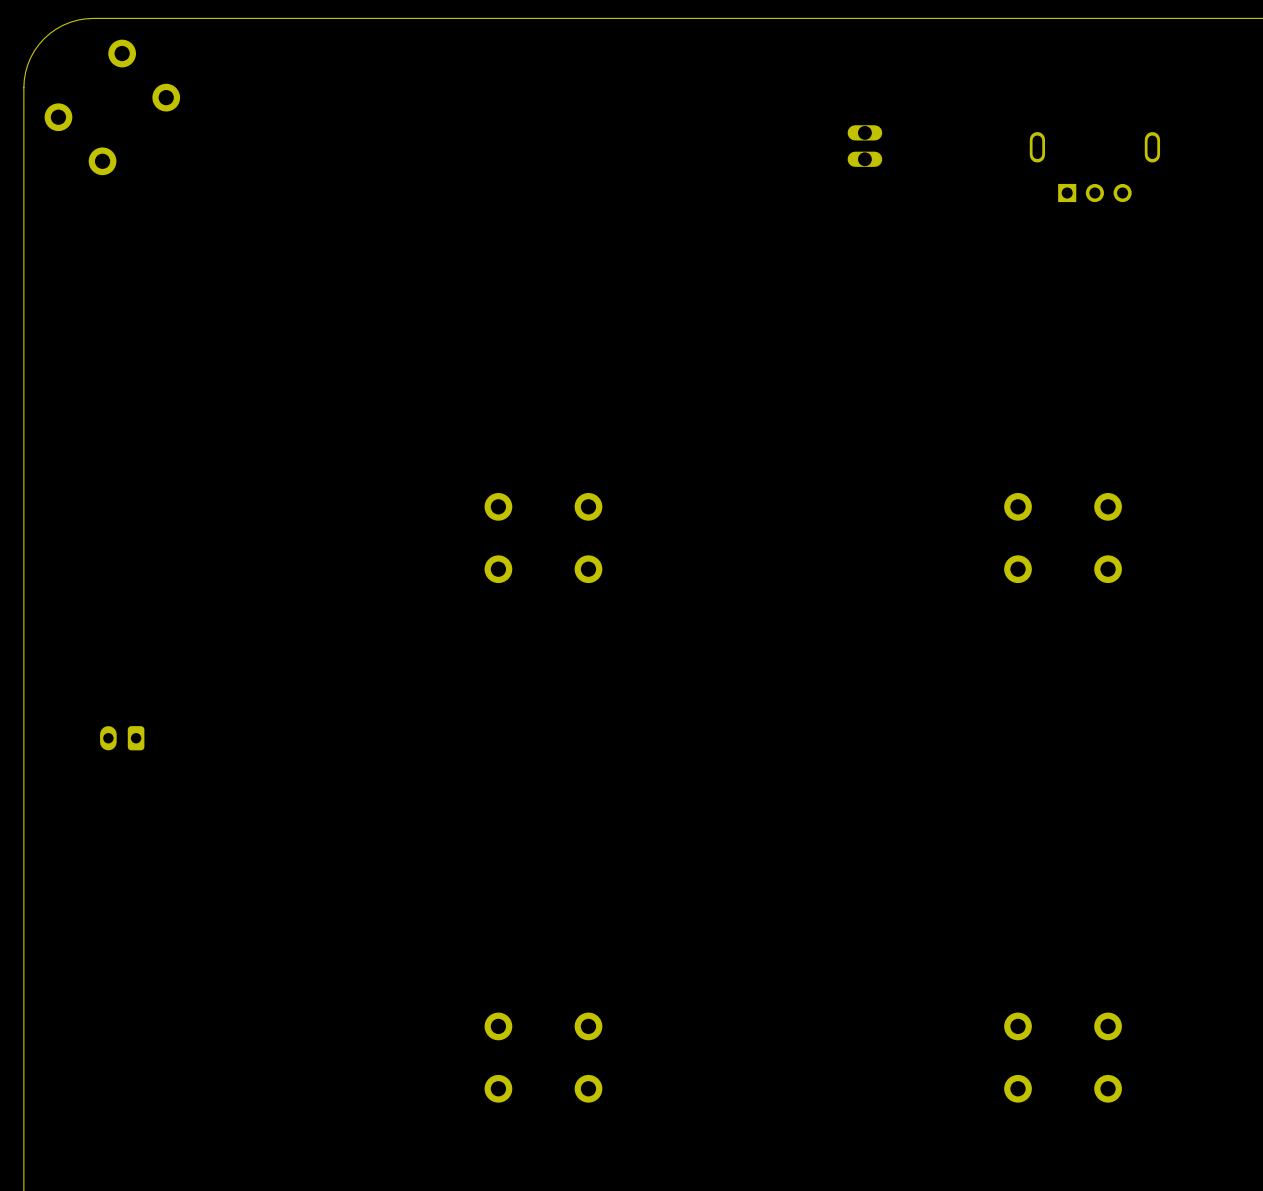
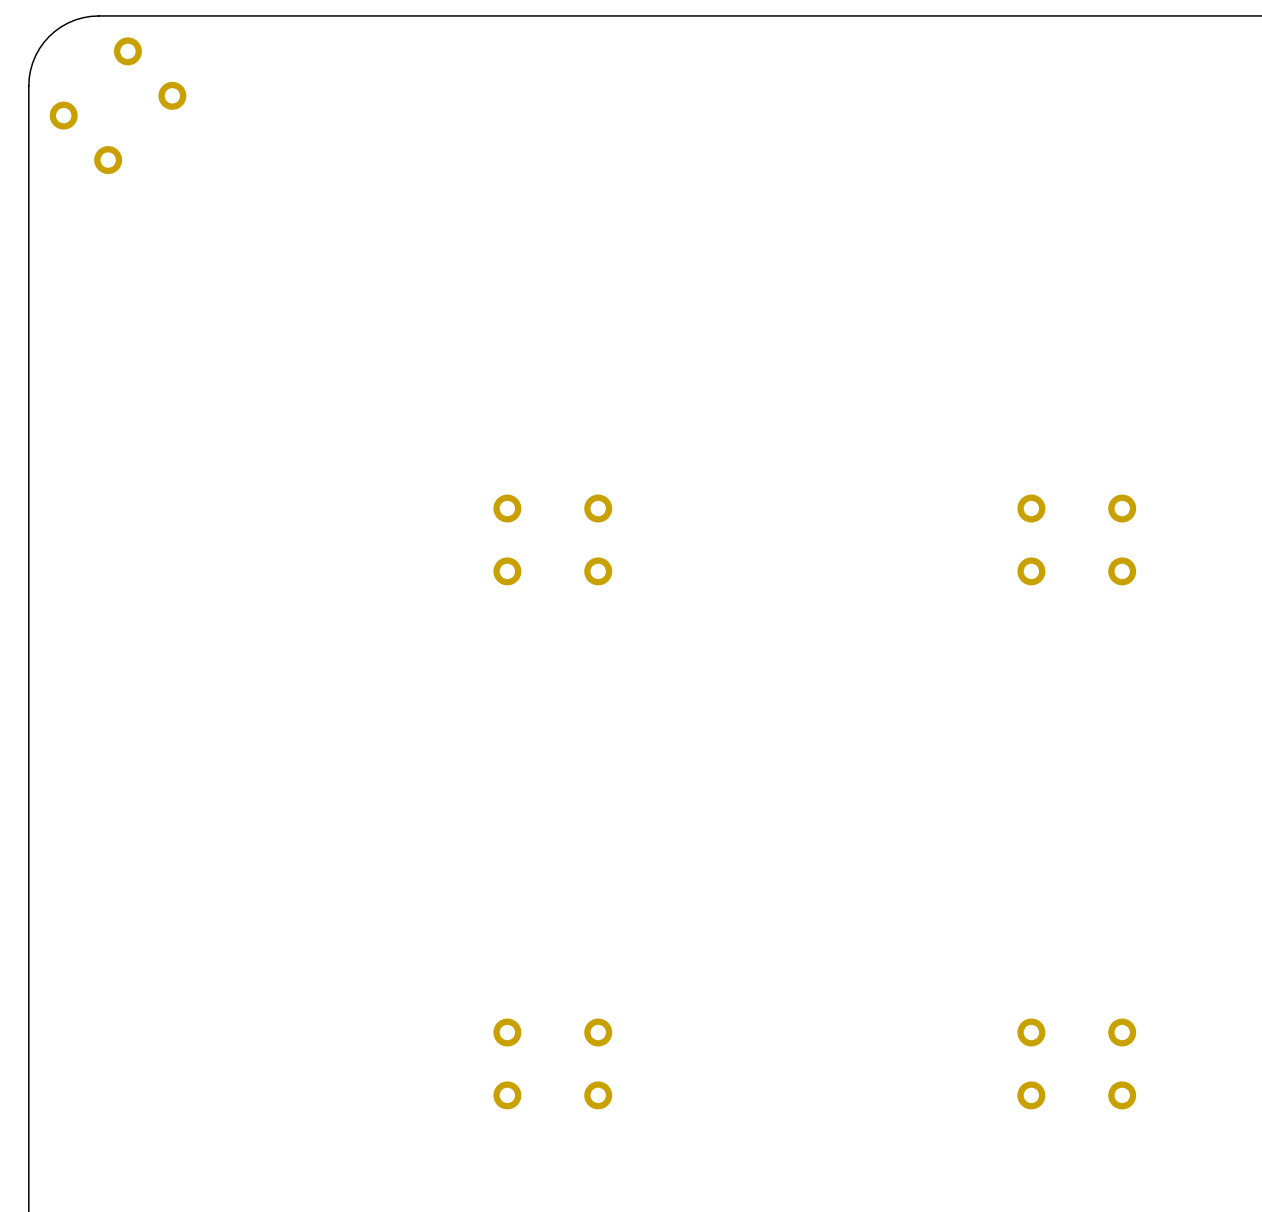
part: (864, 146) -> none
part: (1094, 167) -> none
part: (122, 738) -> none

